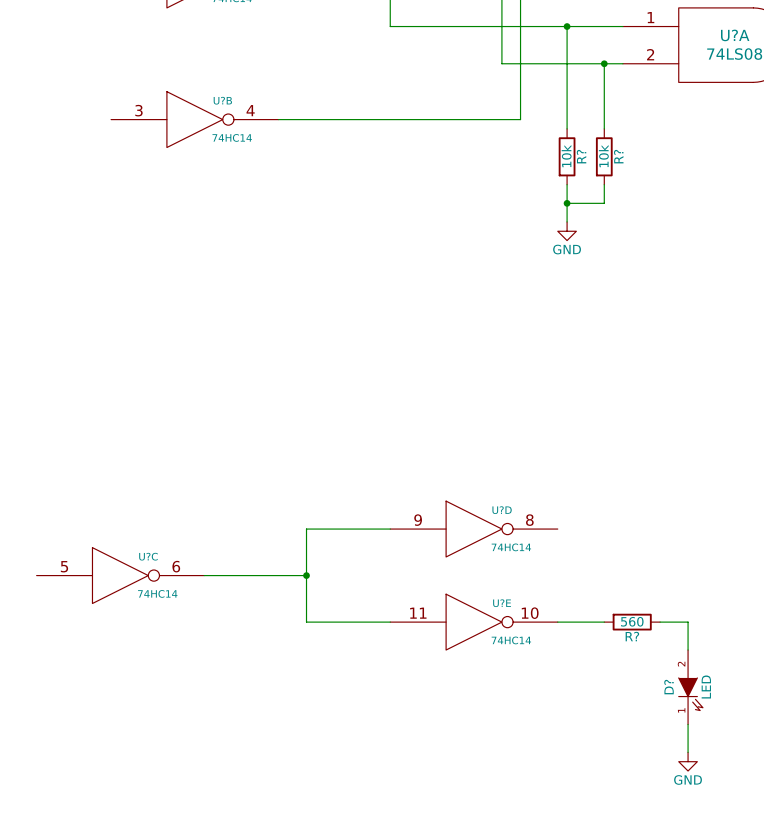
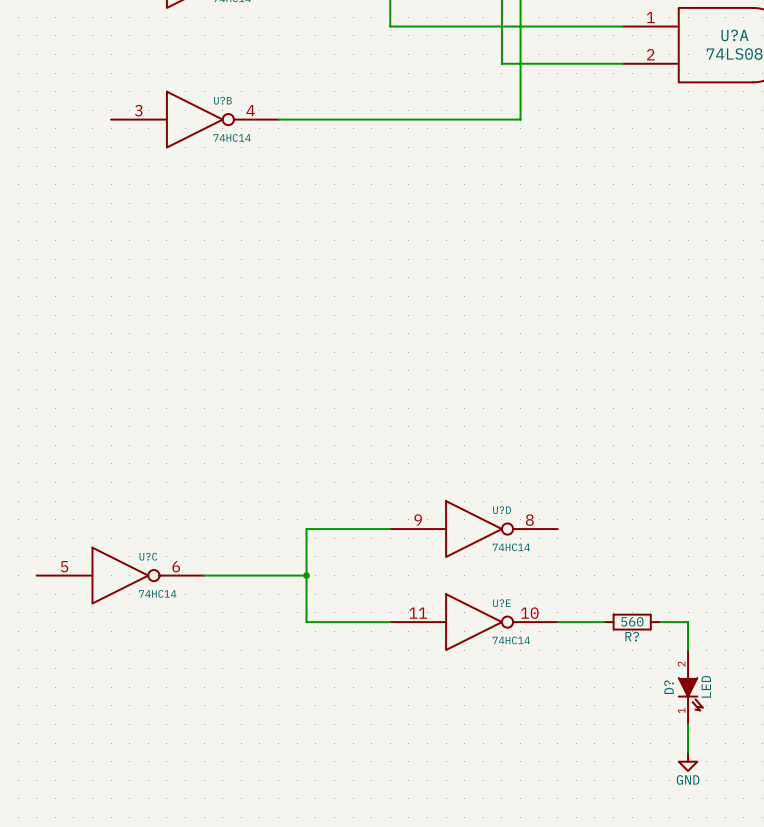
wire: (567, 26) (567, 128) -> none
junction: (567, 26) -> none
wire: (604, 63) (604, 128) -> none
junction: (604, 63) -> none
R?: 10k (567, 156) -> none
R?: 10k (604, 156) -> none
wire: (567, 184) (567, 221) -> none
wire: (604, 184) (604, 203) (567, 203) -> none
junction: (567, 203) -> none
power symbol: GND (567, 231) -> none

